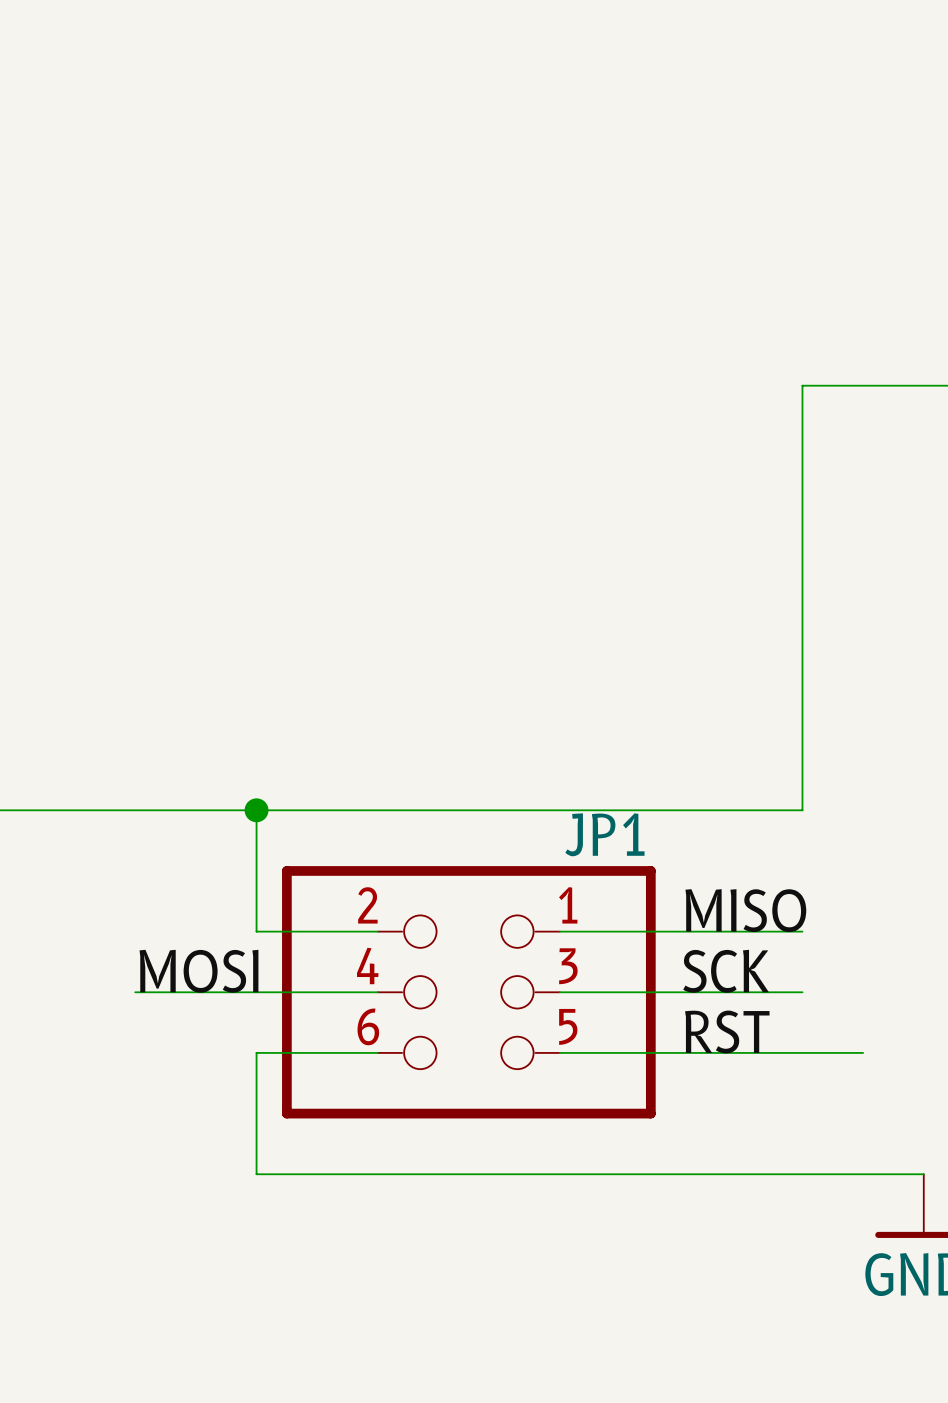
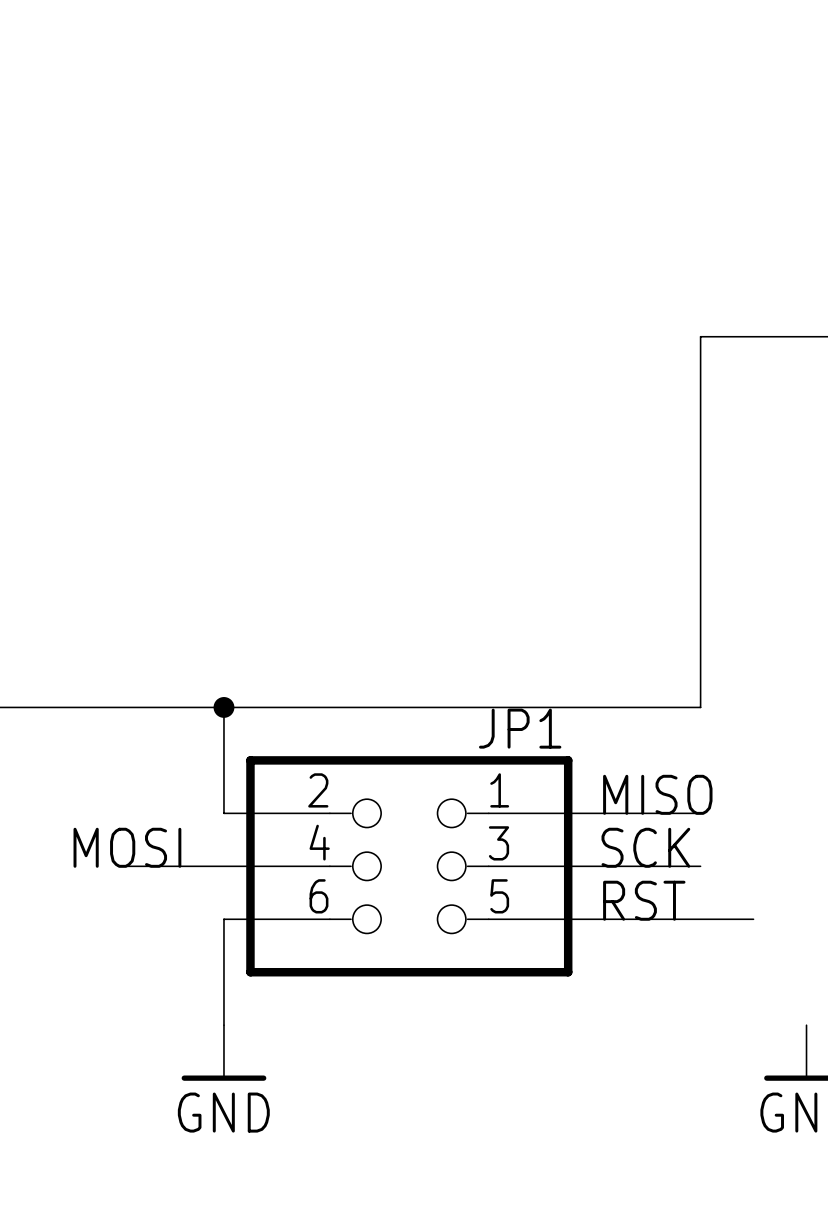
label position: MOSI (198, 971) -> MOSI (127, 847)
wire: (256, 1174) (923, 1174) -> none
power symbol: none -> GND (223, 1052)

